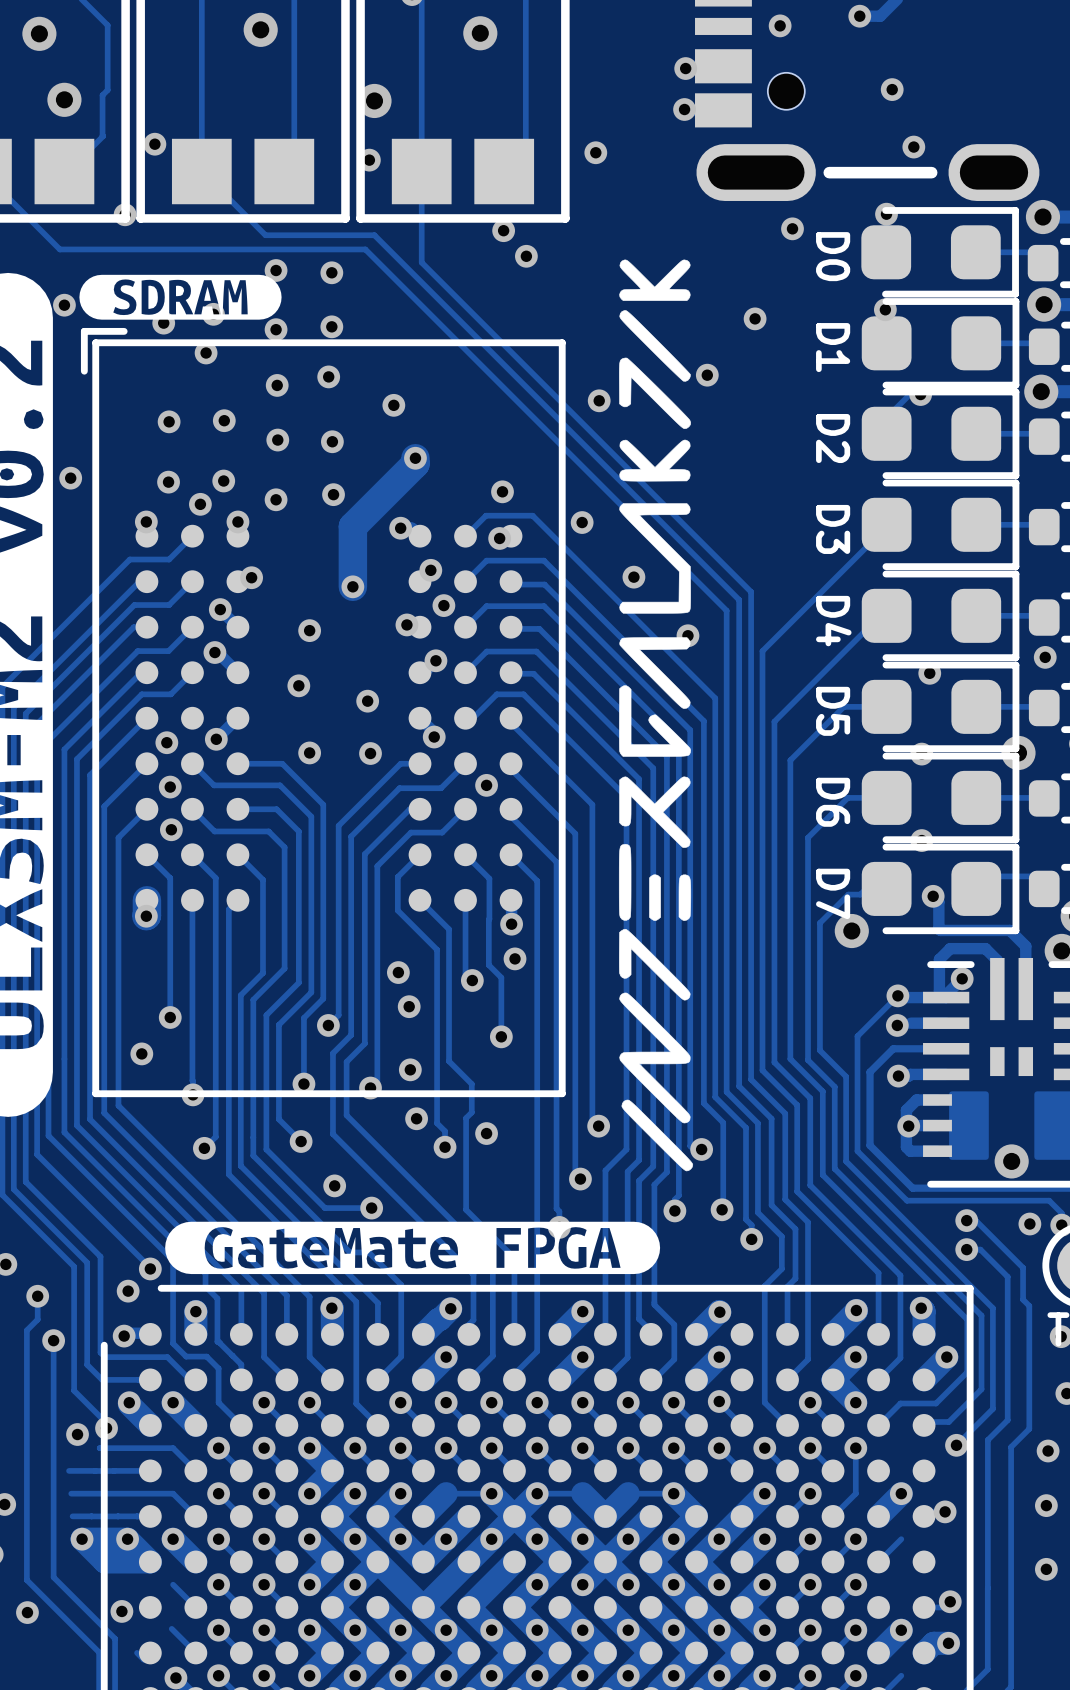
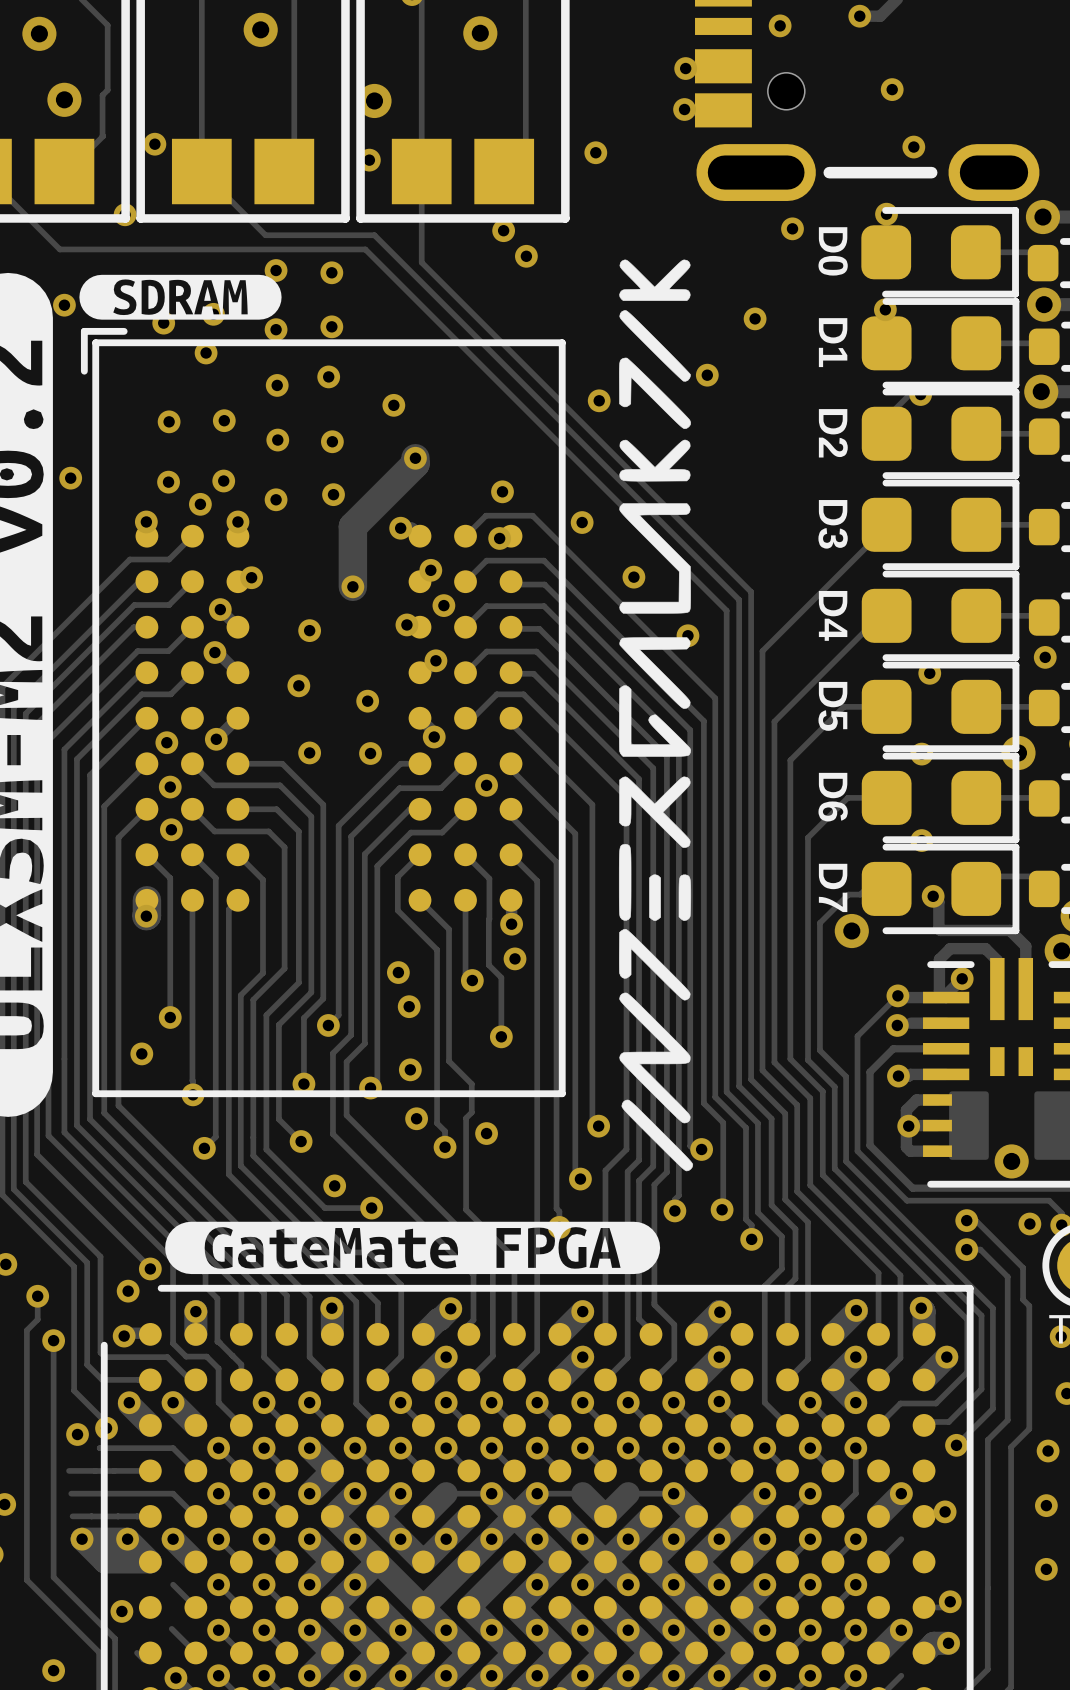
via: (27, 1612) -> none
via: none -> (53, 1670)

